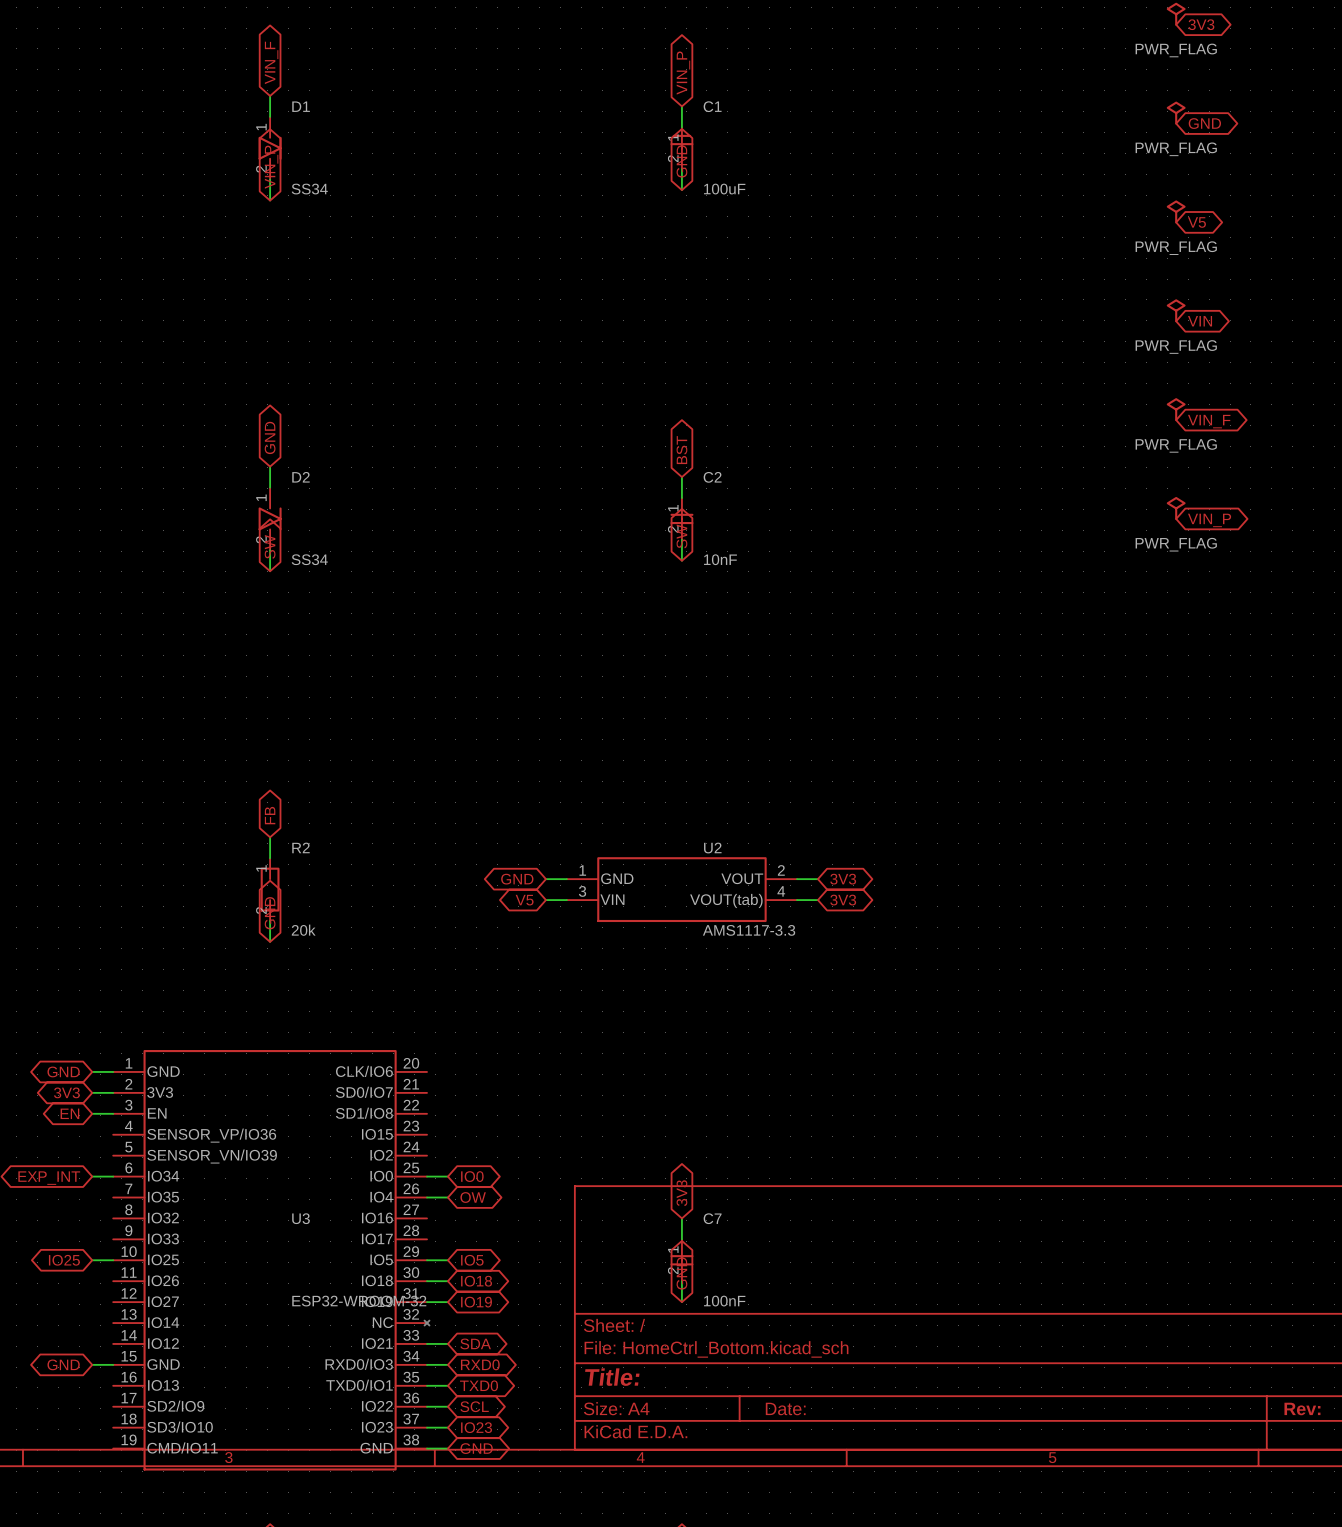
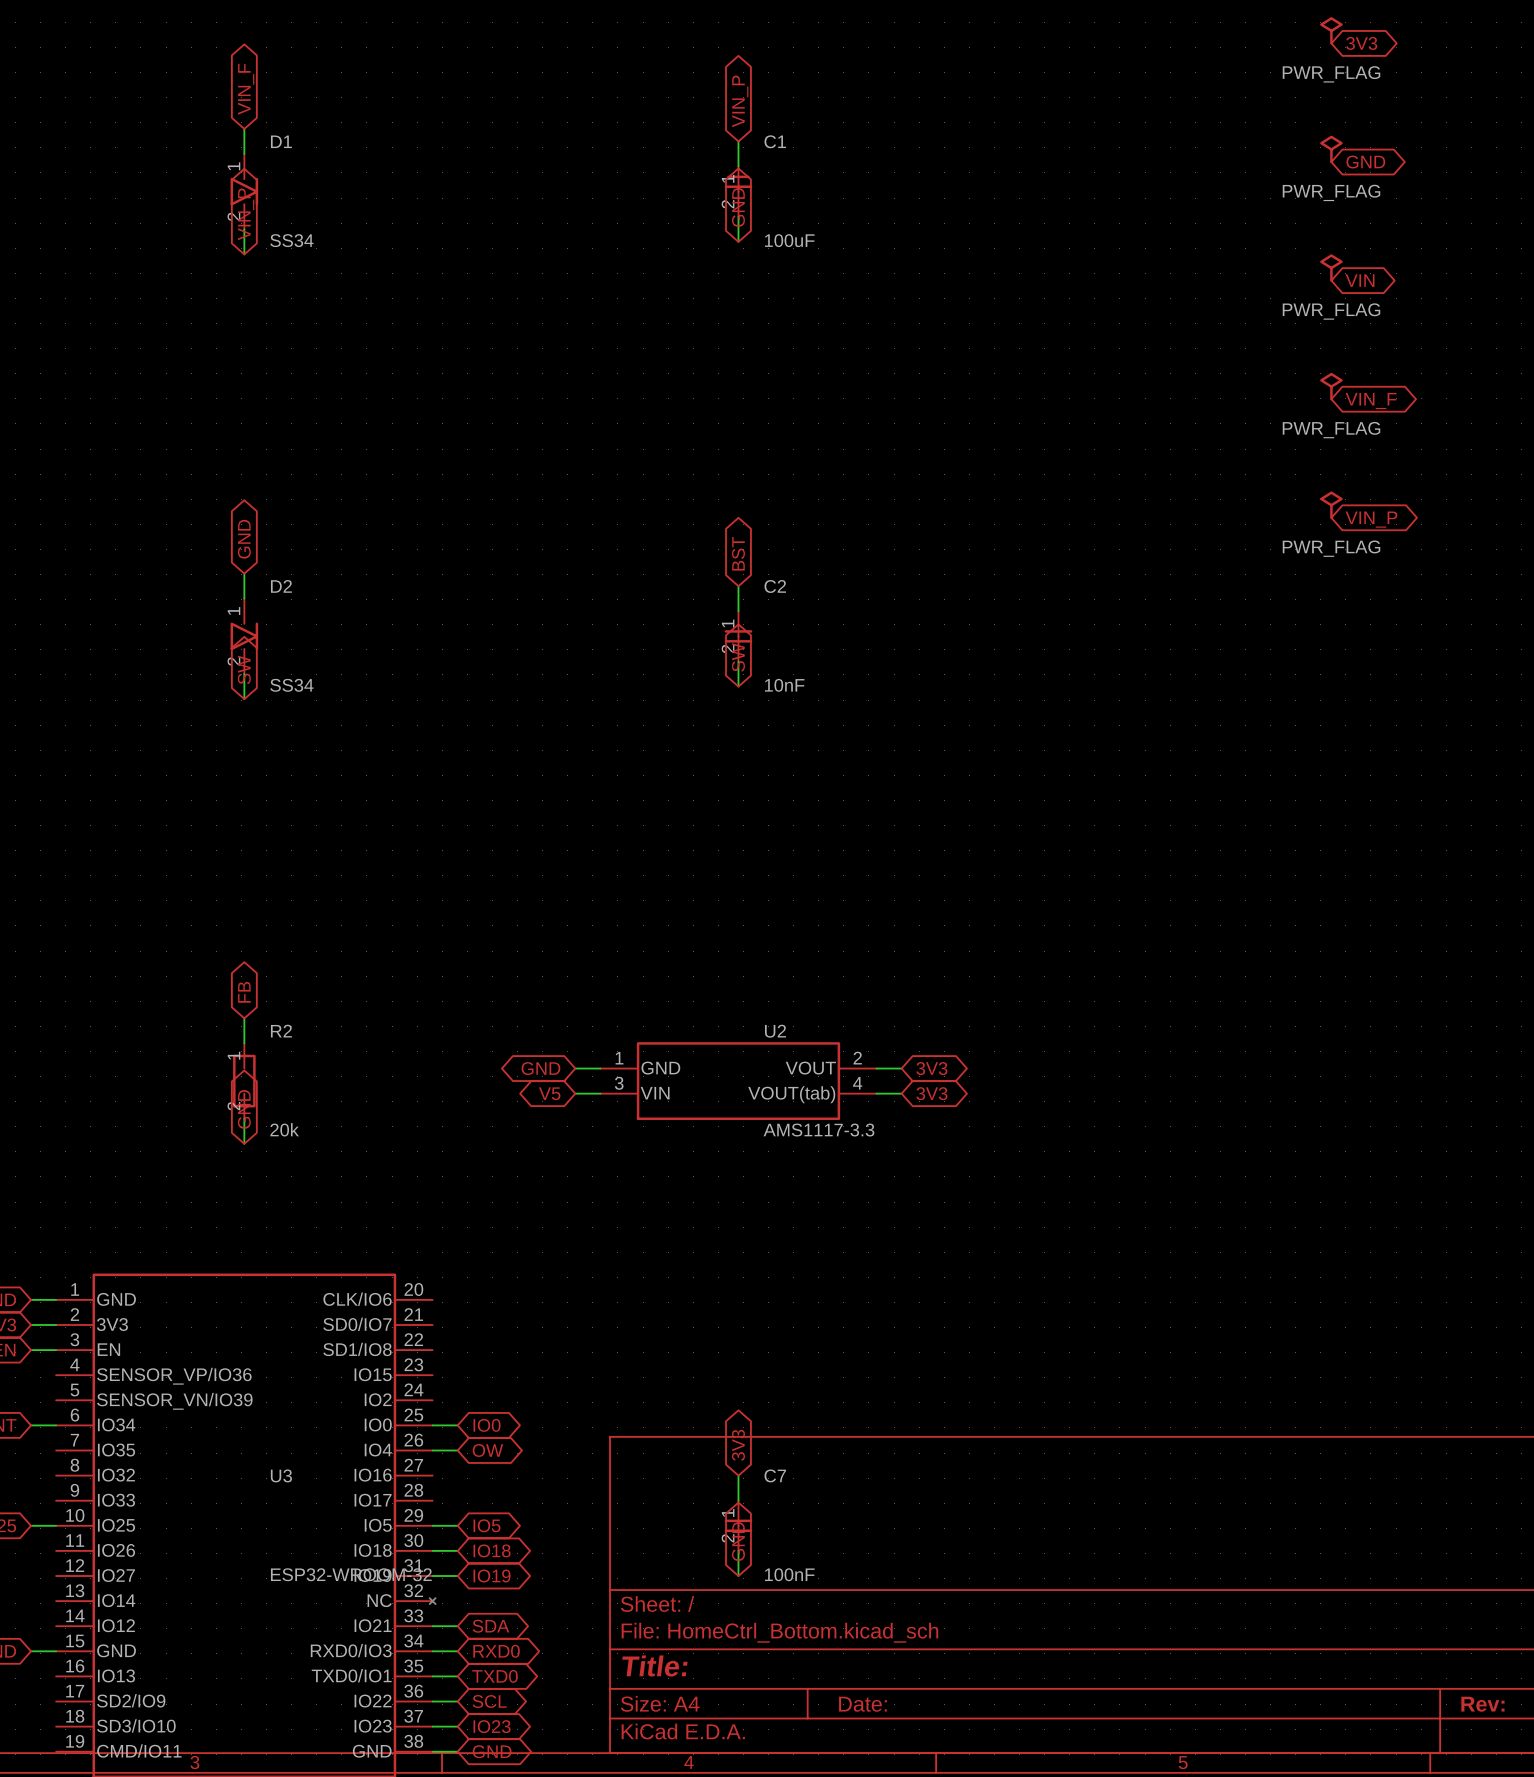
global label: V5 (1196, 222) -> VIN (1360, 280)
global label: VIN (1200, 321) -> VIN_F (1371, 401)
global label: VIN_F (1209, 421) -> VIN_P (1371, 519)
power symbol: PWR_FLAG (1176, 508) -> none
global label: VIN_P (1209, 520) -> none

